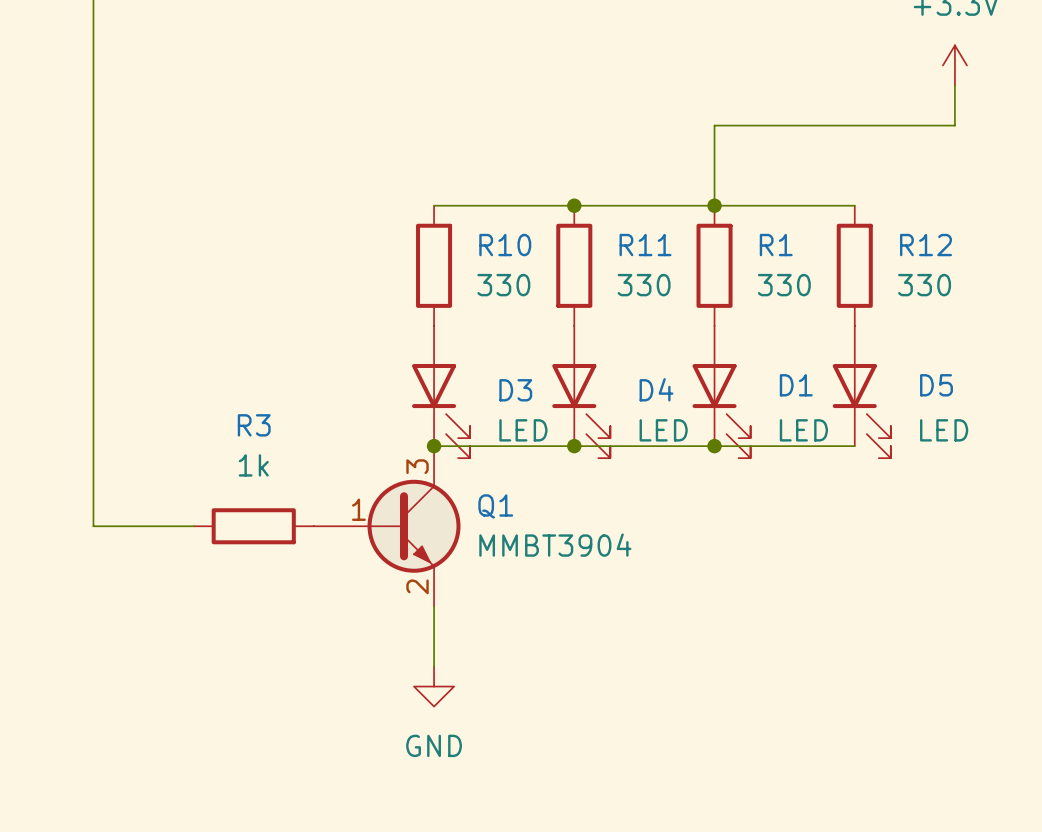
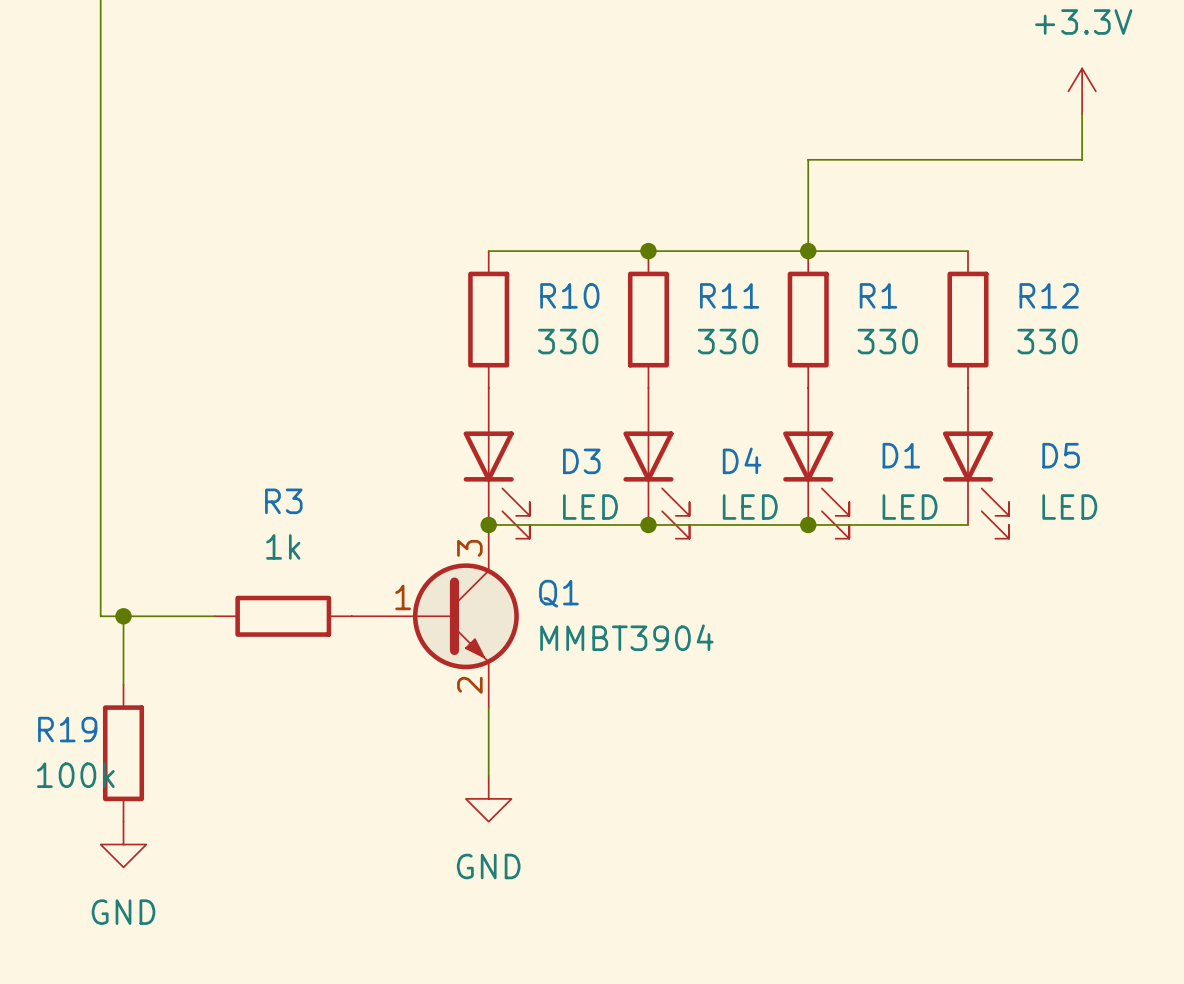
wire: none -> (123, 616) (123, 684)
junction: none -> (123, 616)
R19: none -> 100k (123, 753)
power symbol: none -> GND (123, 844)

